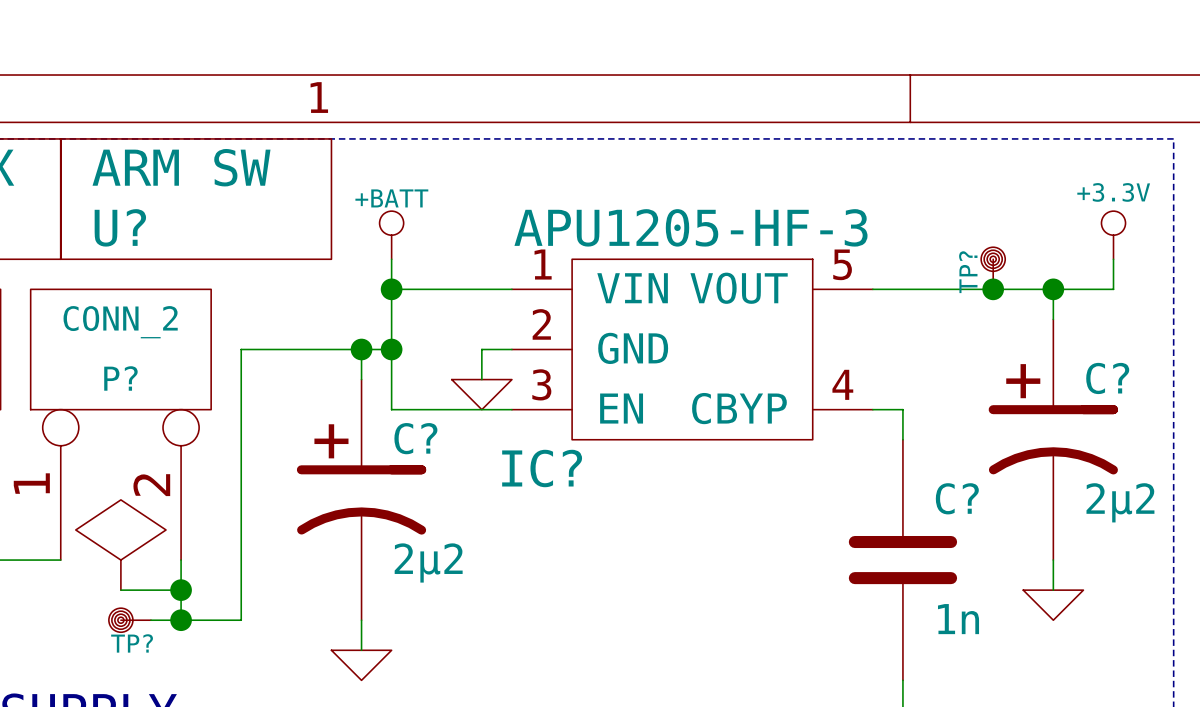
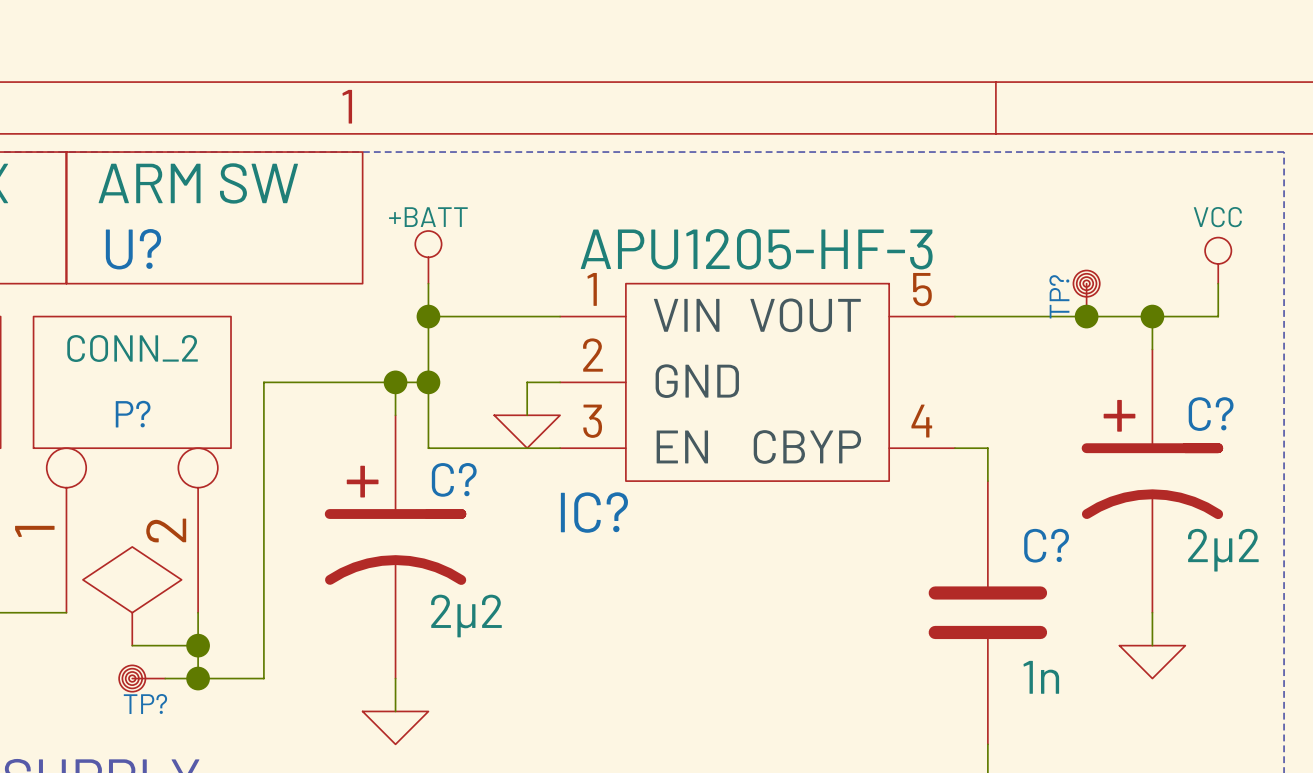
power symbol: +3.3V (1113, 235) -> VCC (1218, 260)

